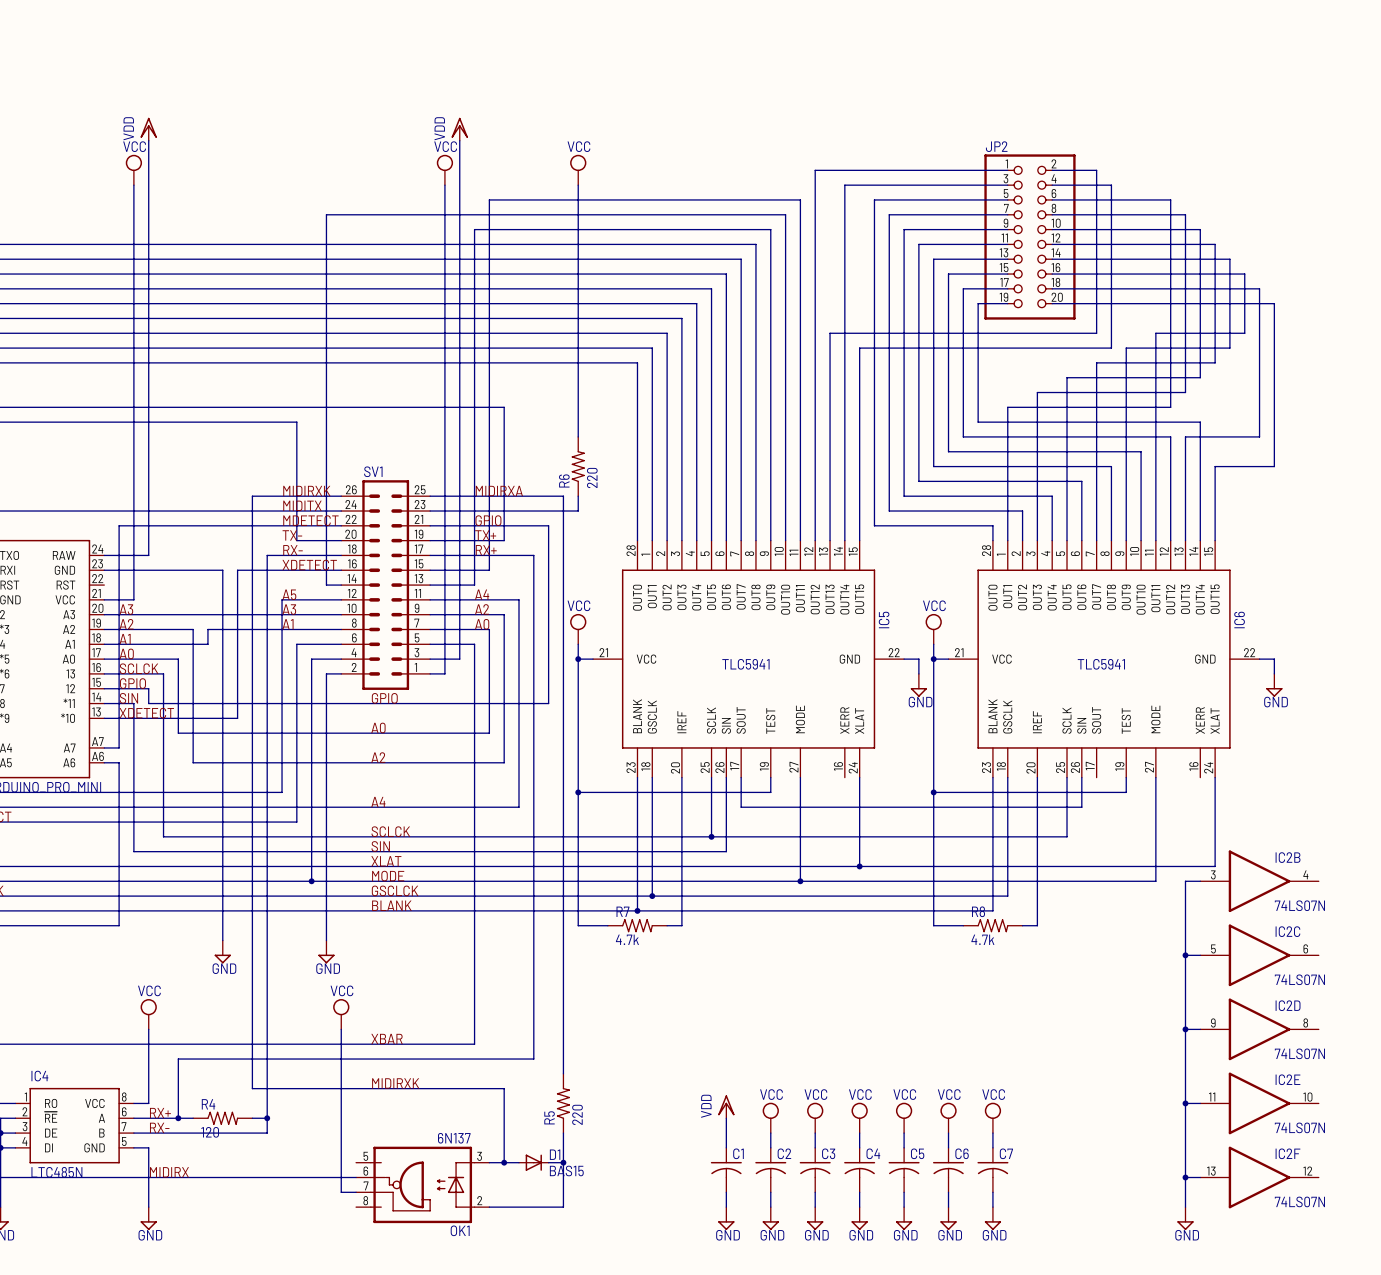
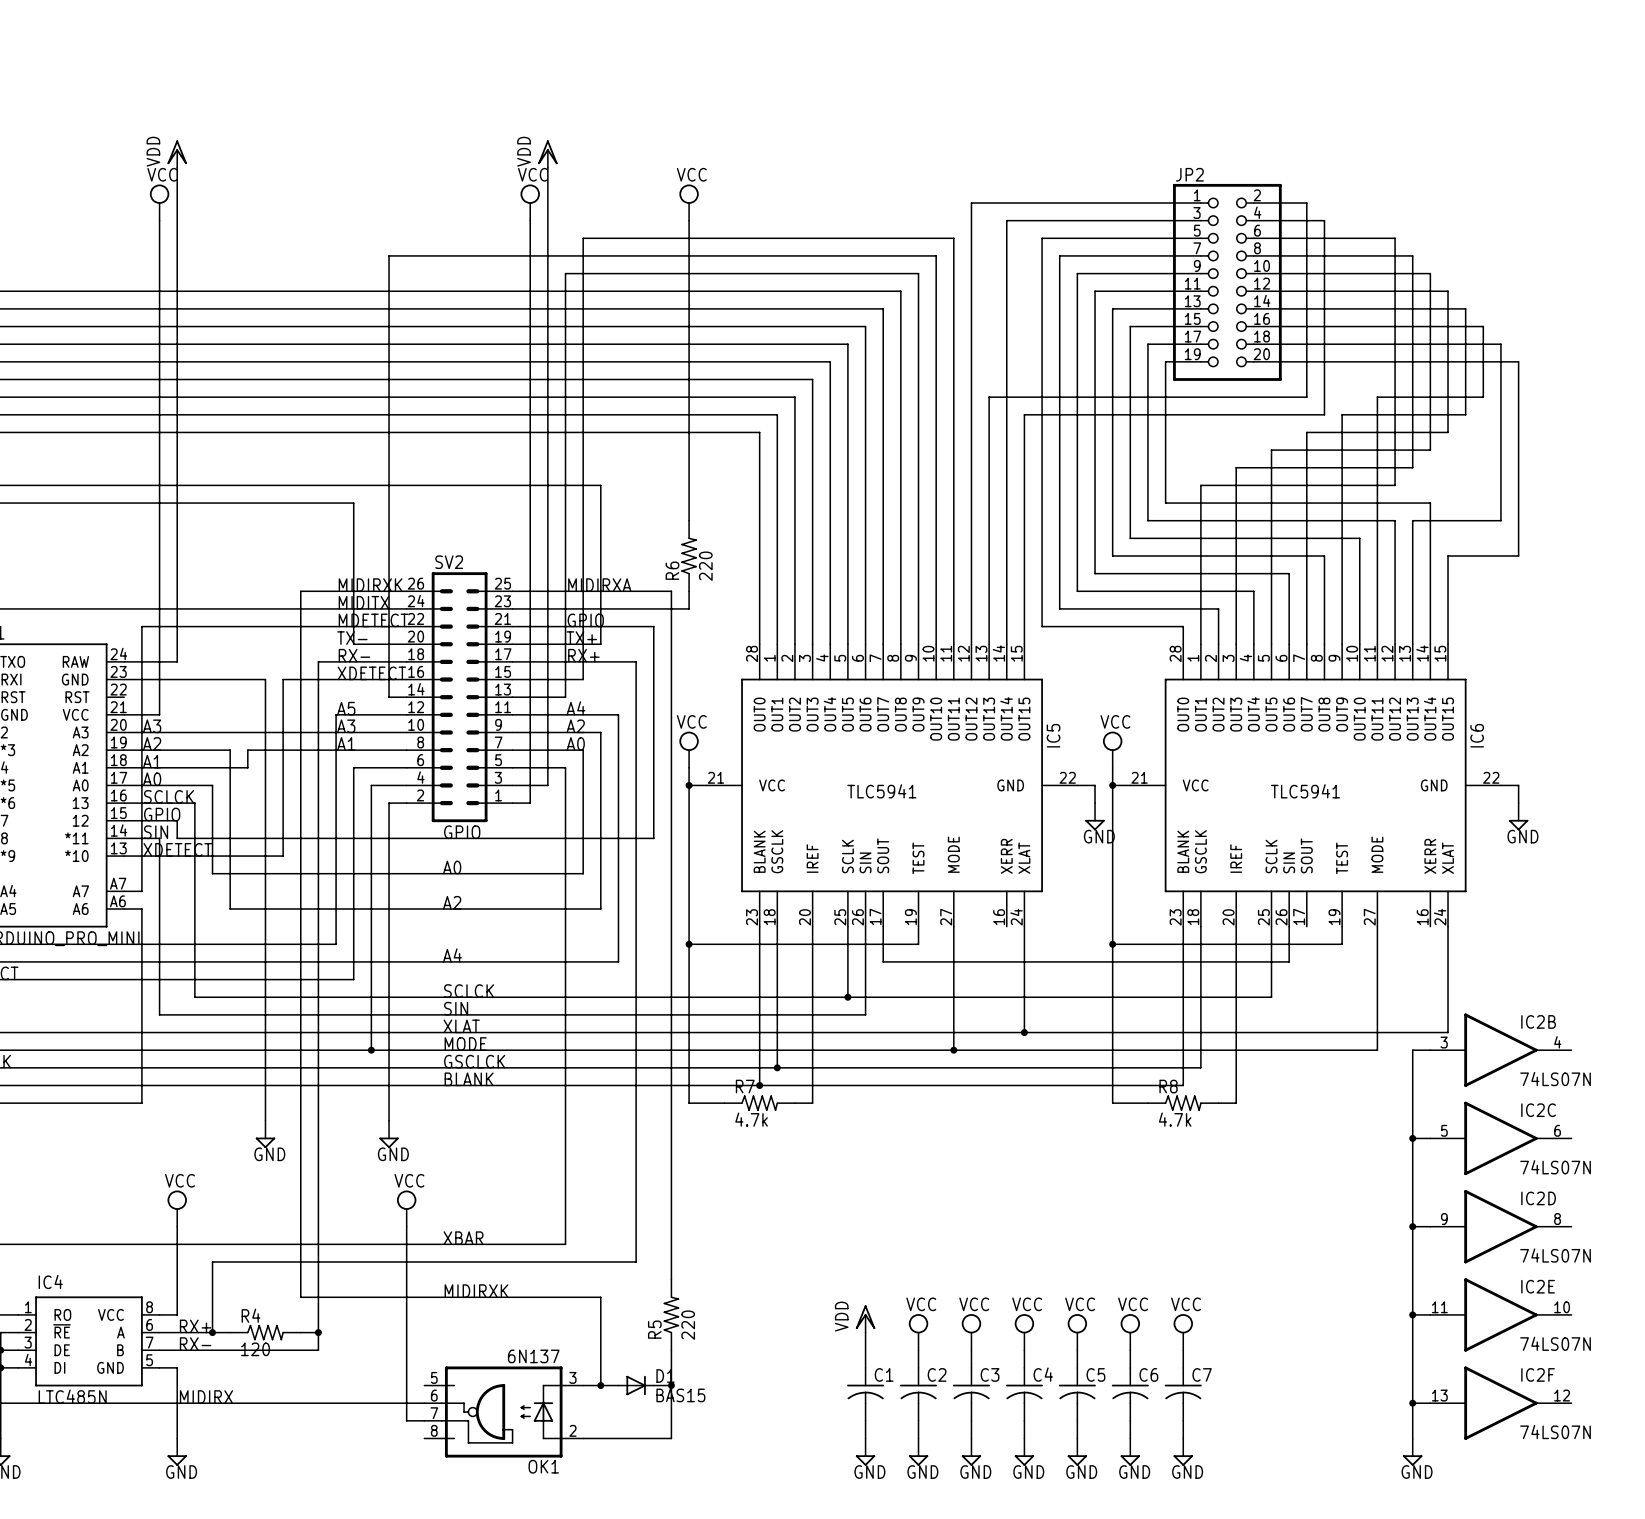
SV1 name: SV1 (373, 471) -> SV2 (449, 562)

